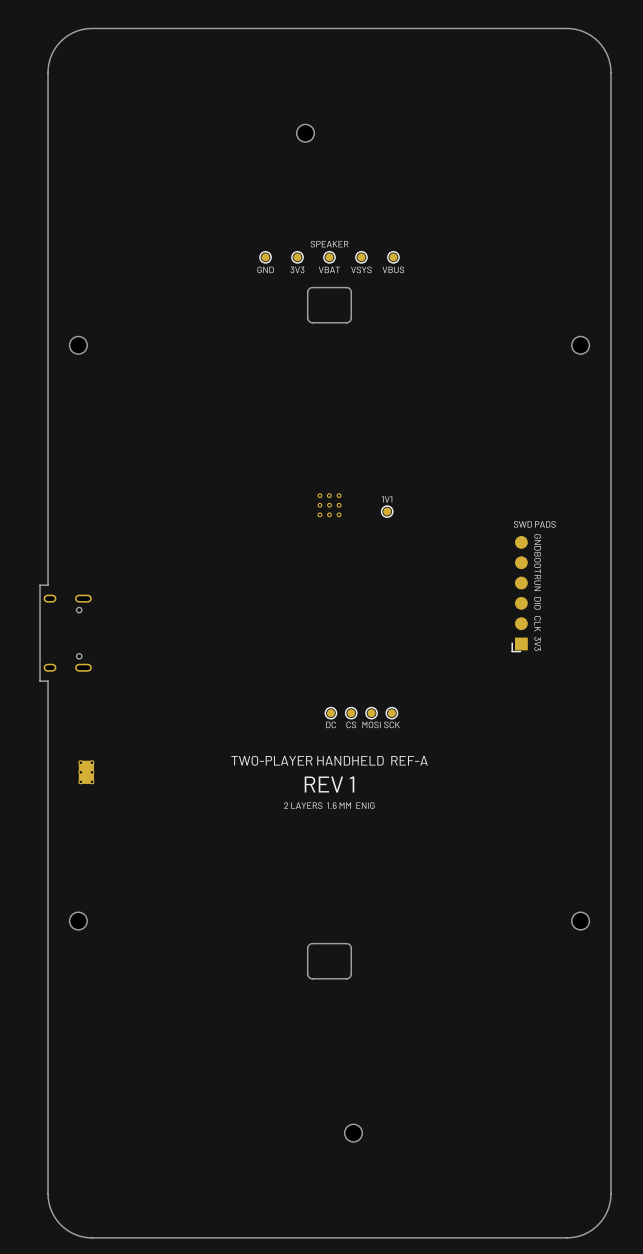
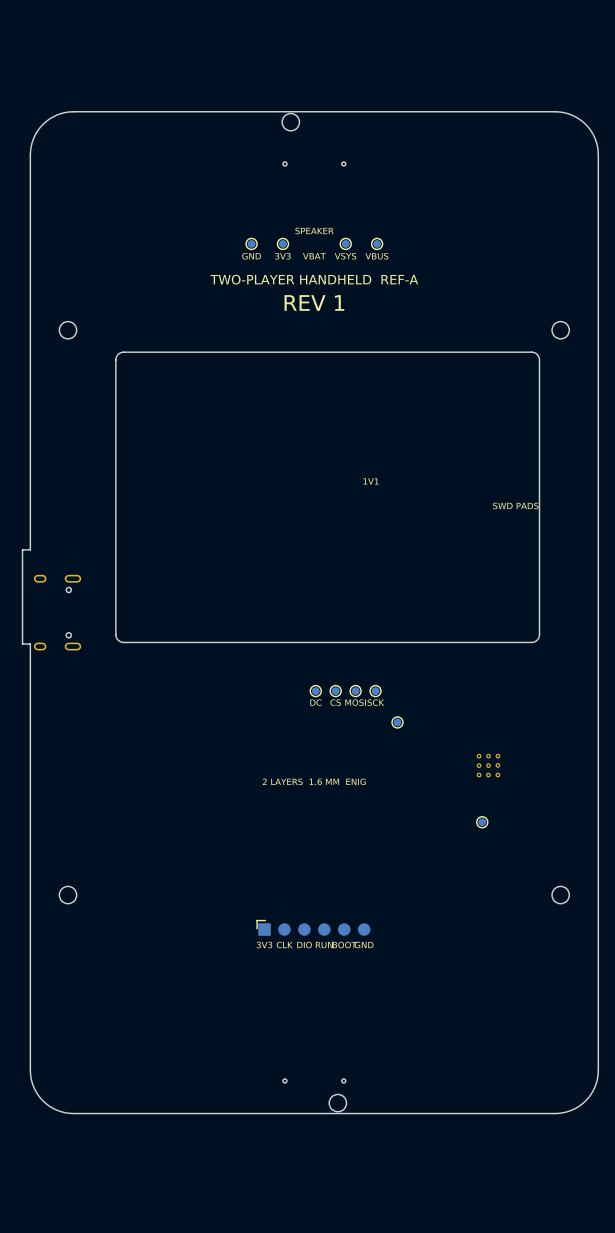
part: none -> (284, 163)
part: none -> (343, 163)
part: (329, 257) -> none
board edge: (346, 287) (309, 288) (309, 321) (349, 321) (351, 291) (346, 287) -> none
text: none -> TWO-PLAYER HANDHELD REF-A (314, 279)
text: none -> REV 1 (314, 302)
board edge: none -> (531, 352) (123, 352) (118, 353) (115, 360) (115, 634) (117, 639) (123, 642) (531, 642) (536, 640) (539, 634) (539, 360) (537, 354) (531, 352)
part: (329, 505) -> none
part: (387, 511) -> none
part: (519, 594) -> none
board edge: (40, 665) (40, 585) (48, 585) (48, 72) (49, 59) (58, 44) (75, 31) (92, 28) (566, 28) (583, 31) (594, 38) (607, 55) (610, 72) (610, 1193) (607, 1210) (598, 1224) (583, 1234) (566, 1237) (92, 1237) (75, 1234) (60, 1224) (51, 1210) (48, 1193) (48, 681) (40, 681) -> (30, 644) (22, 644) (22, 549) (30, 549) (30, 154) (33, 138) (43, 124) (57, 115) (73, 111) (555, 111) (571, 115) (585, 124) (595, 138) (598, 154) (598, 1070) (595, 1086) (585, 1100) (571, 1110) (555, 1113) (73, 1113) (57, 1110) (46, 1103) (33, 1086) (30, 1070) (30, 659)
part: none -> (397, 722)
text: TWO-PLAYER HANDHELD REF-A (329, 760) -> none
part: (86, 772) -> none
text: REV 1 (329, 784) -> none
part: none -> (488, 765)
part: none -> (482, 822)
board edge: (346, 943) (309, 945) (309, 977) (349, 977) (351, 947) (346, 943) -> none
part: none -> (313, 927)
part: none -> (284, 1080)
part: none -> (343, 1080)

